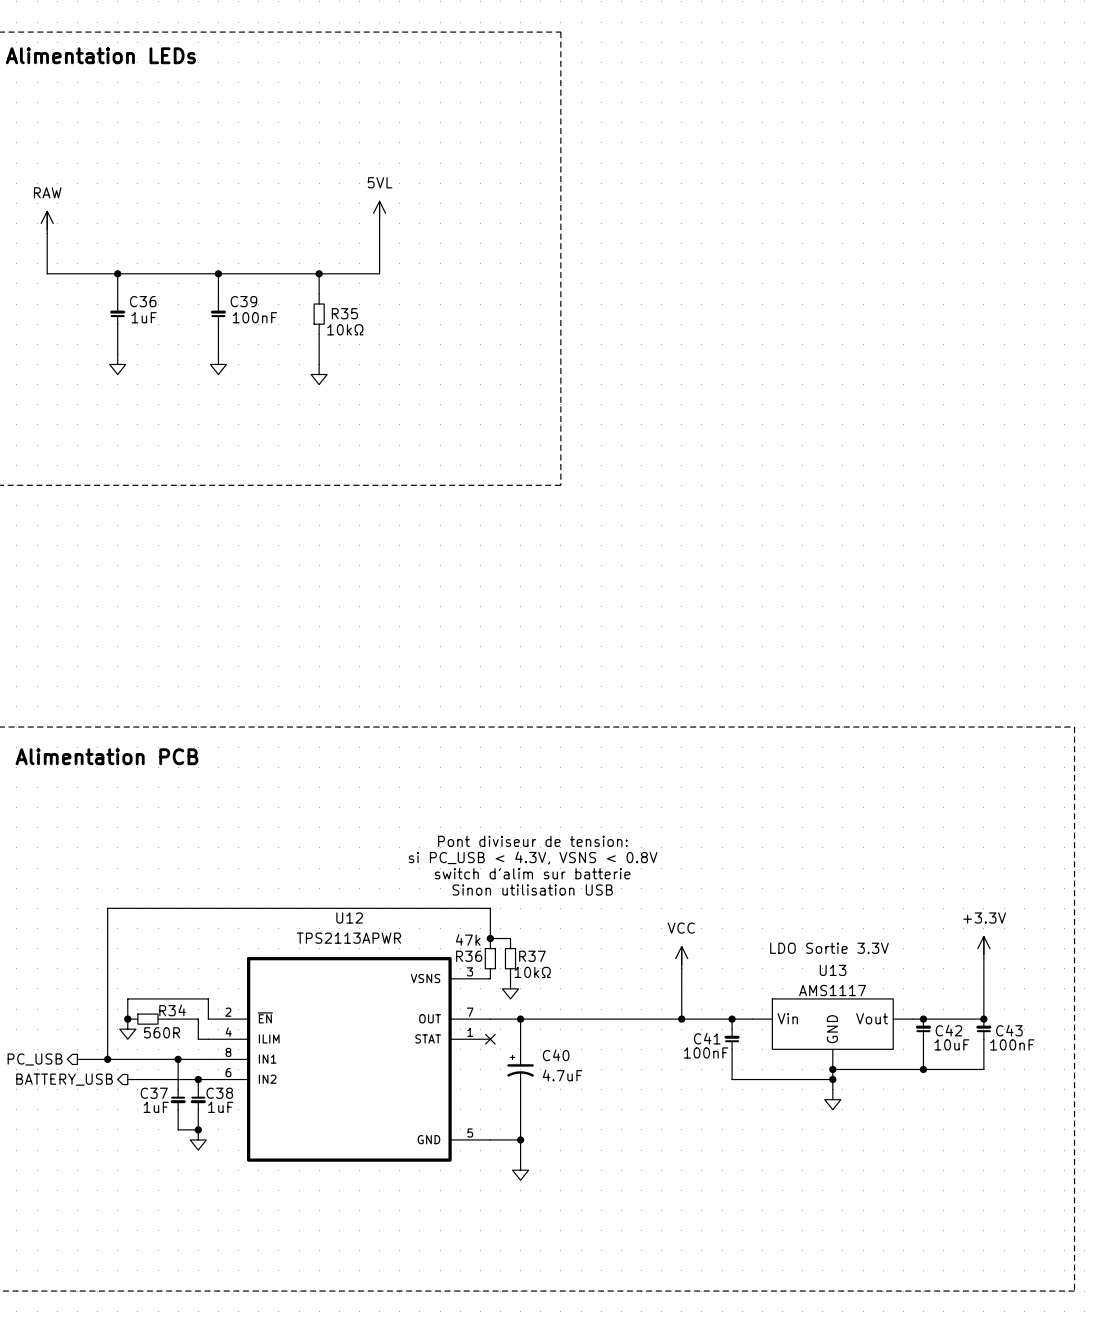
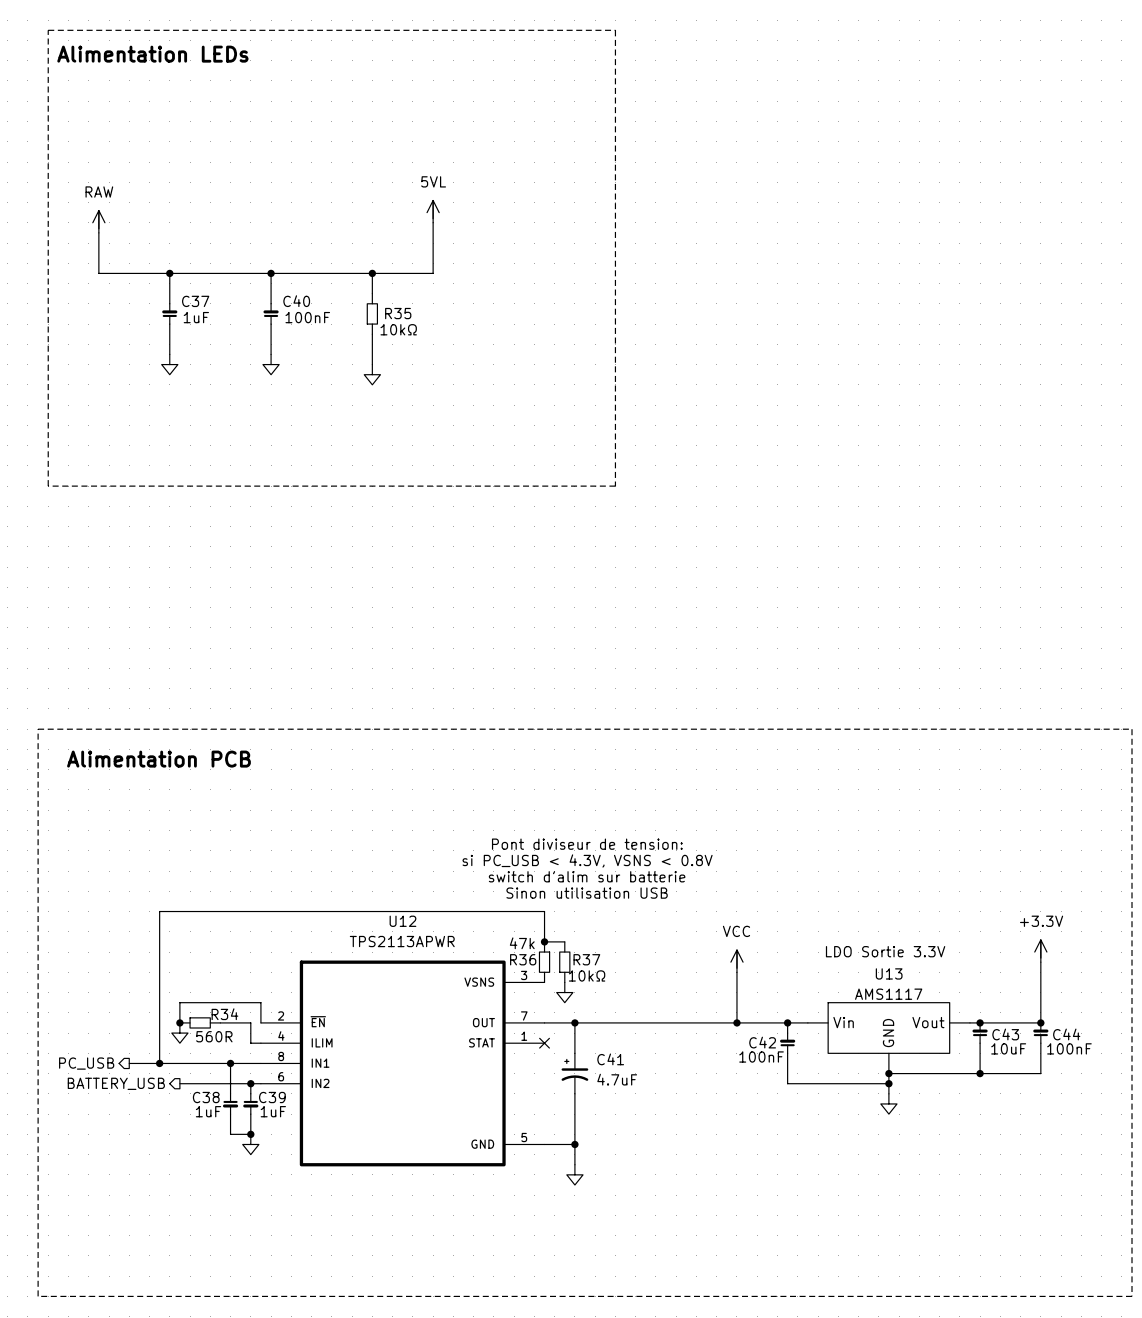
C36 name: C36 (143, 301) -> C37 (195, 301)
C39 name: C39 (243, 301) -> C40 (296, 301)
C42 name: C42 (948, 1030) -> C43 (1005, 1034)
C43 name: C43 (1009, 1030) -> C44 (1066, 1034)
C41 name: C41 (707, 1038) -> C42 (762, 1042)
C40 name: C40 (556, 1055) -> C41 (610, 1059)
C37 name: C37 (154, 1093) -> C38 (206, 1097)
C38 name: C38 (219, 1093) -> C39 (272, 1097)

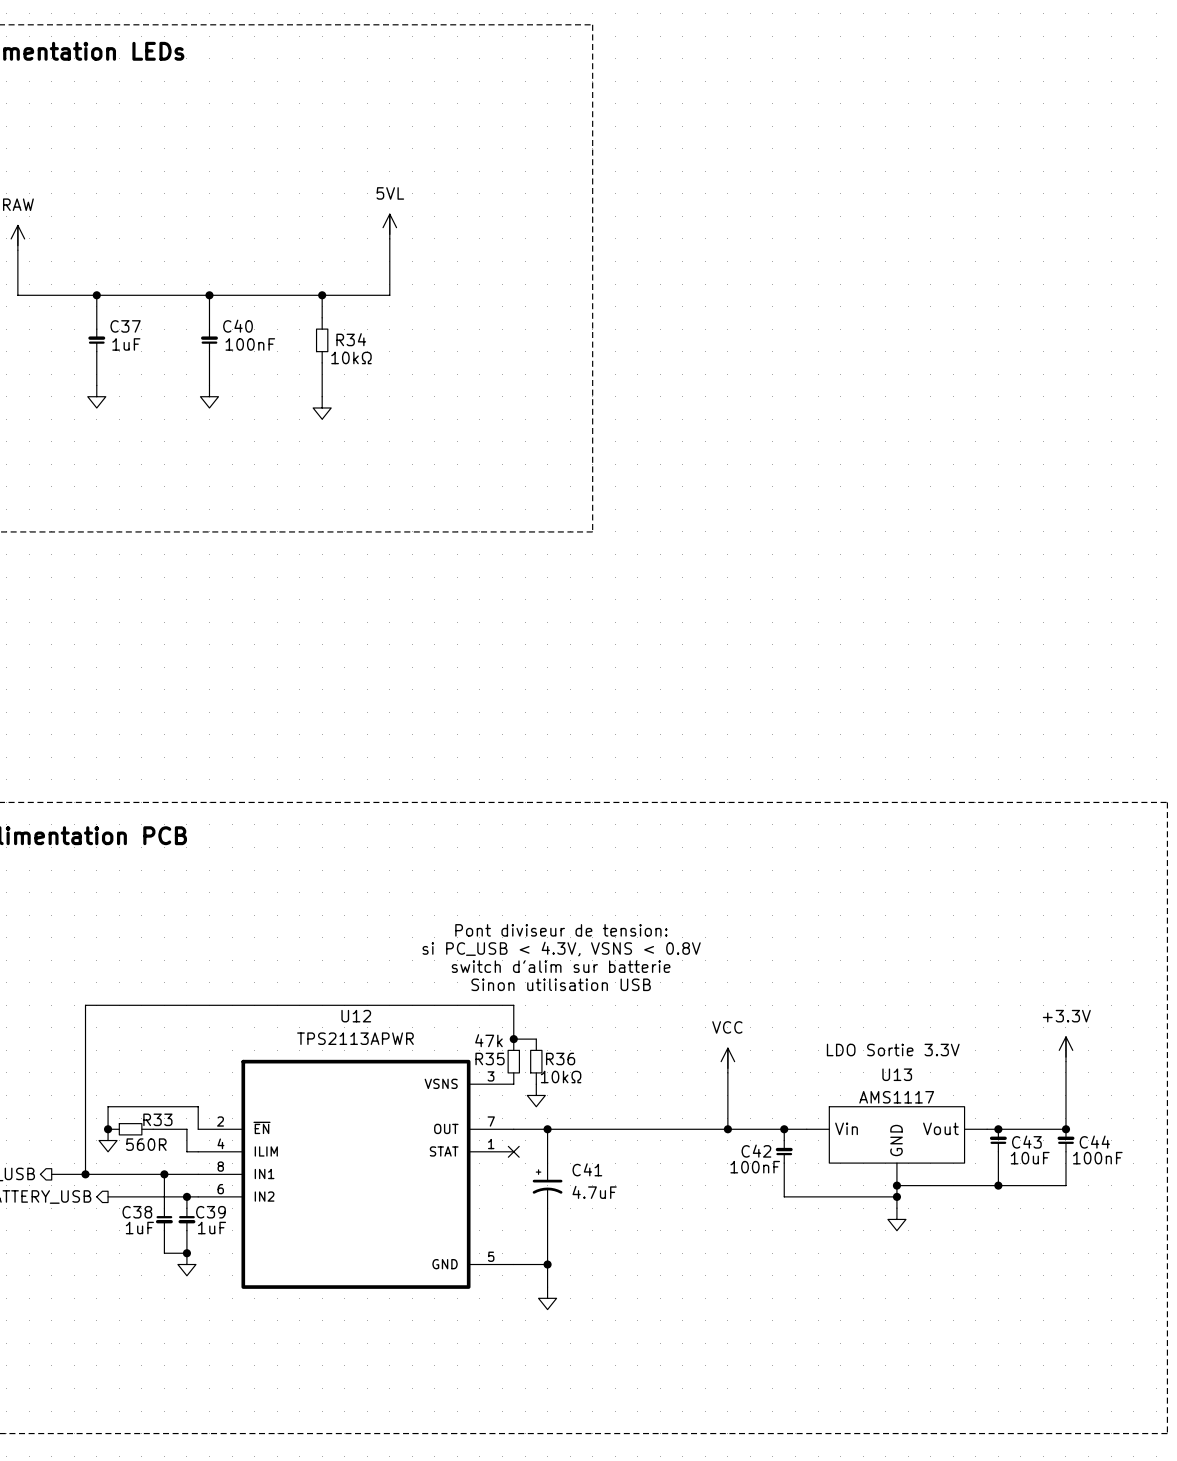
R35 name: R35 (398, 313) -> R34 (351, 339)
R36 name: R36 (523, 959) -> R35 (490, 1058)
R37 name: R37 (586, 959) -> R36 (560, 1058)
R34 name: R34 (224, 1014) -> R33 (157, 1119)

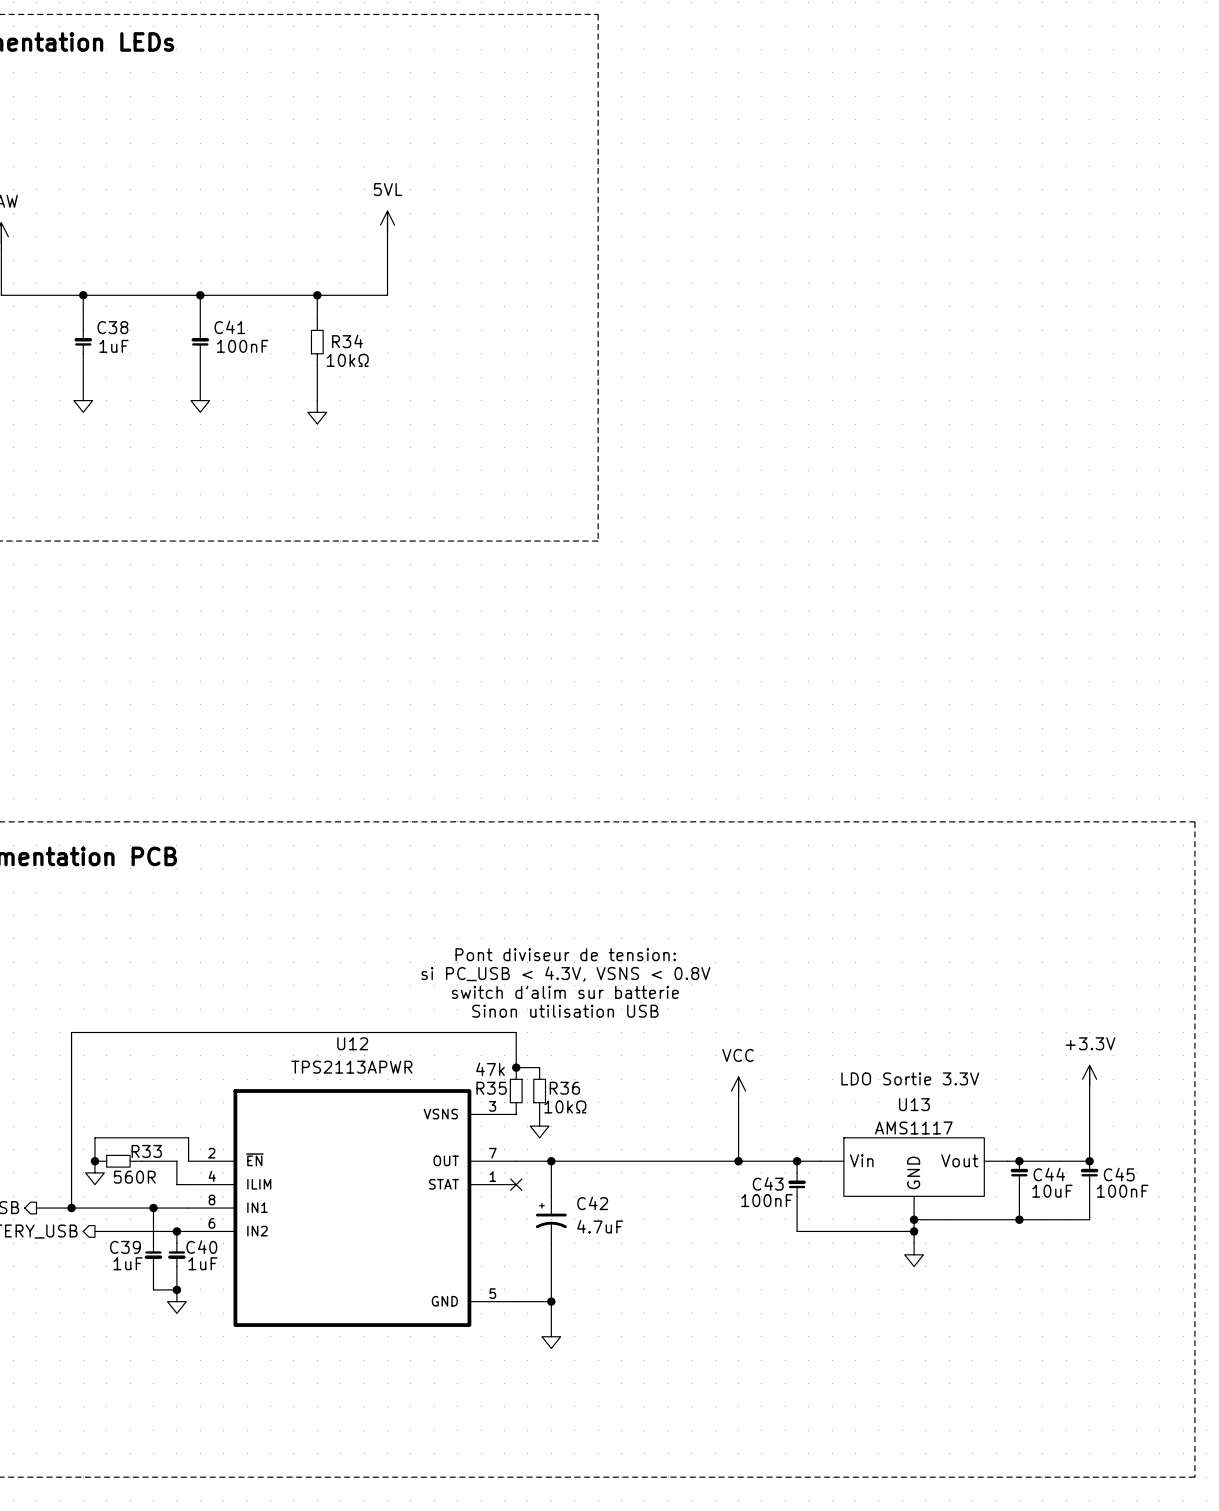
C37 name: C37 (125, 326) -> C38 (112, 327)
C40 name: C40 (238, 326) -> C41 (229, 327)
C43 name: C43 (1026, 1142) -> C44 (1049, 1174)
C44 name: C44 (1094, 1142) -> C45 (1119, 1174)
C42 name: C42 (756, 1151) -> C43 (768, 1183)
C41 name: C41 (587, 1169) -> C42 (592, 1203)
C38 name: C38 (137, 1212) -> C39 (125, 1247)
C39 name: C39 (210, 1212) -> C40 (201, 1247)

